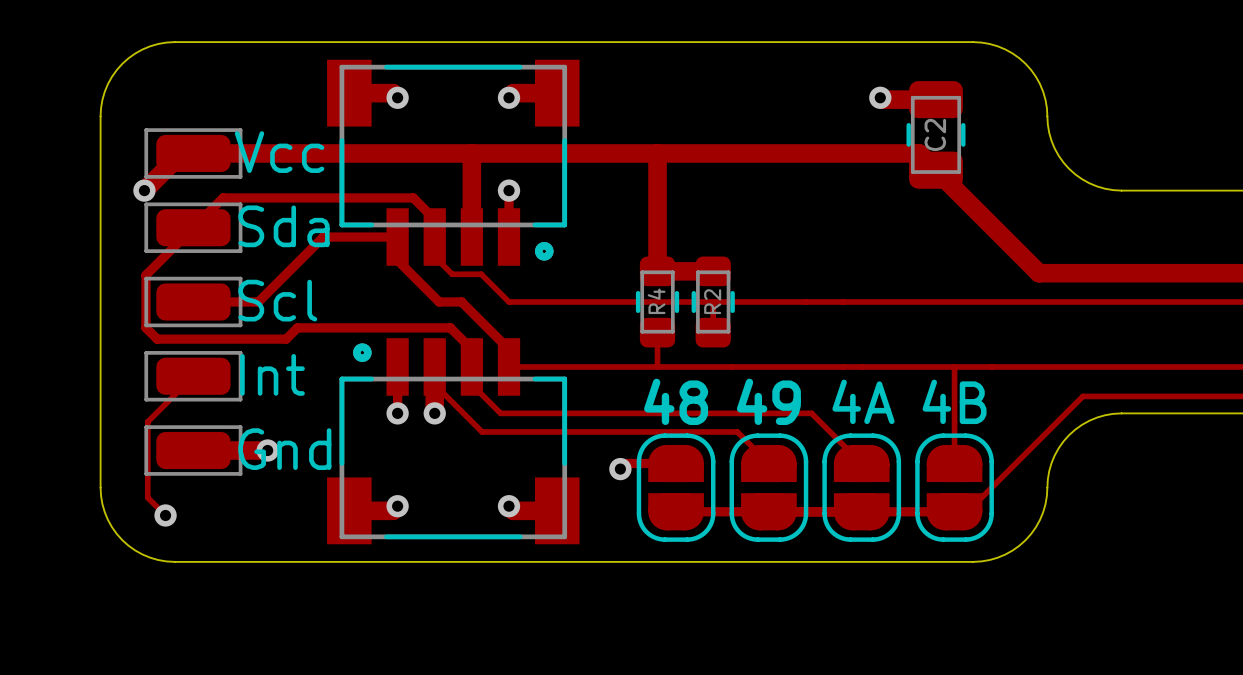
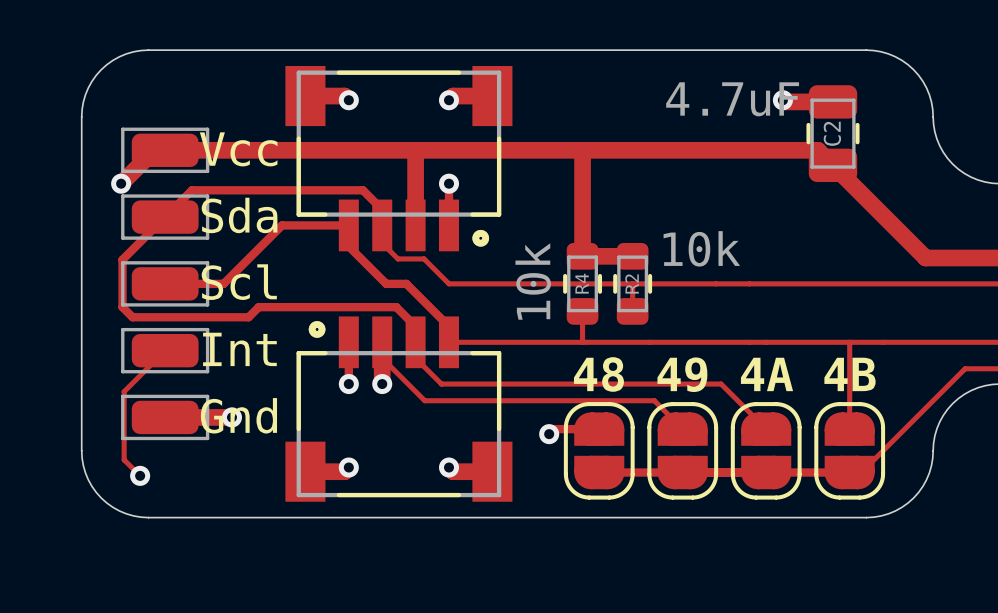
C2 value: none -> 4.7uF (732, 99)
R2 value: none -> 10k (701, 248)
R4 value: none -> 10k (533, 281)

